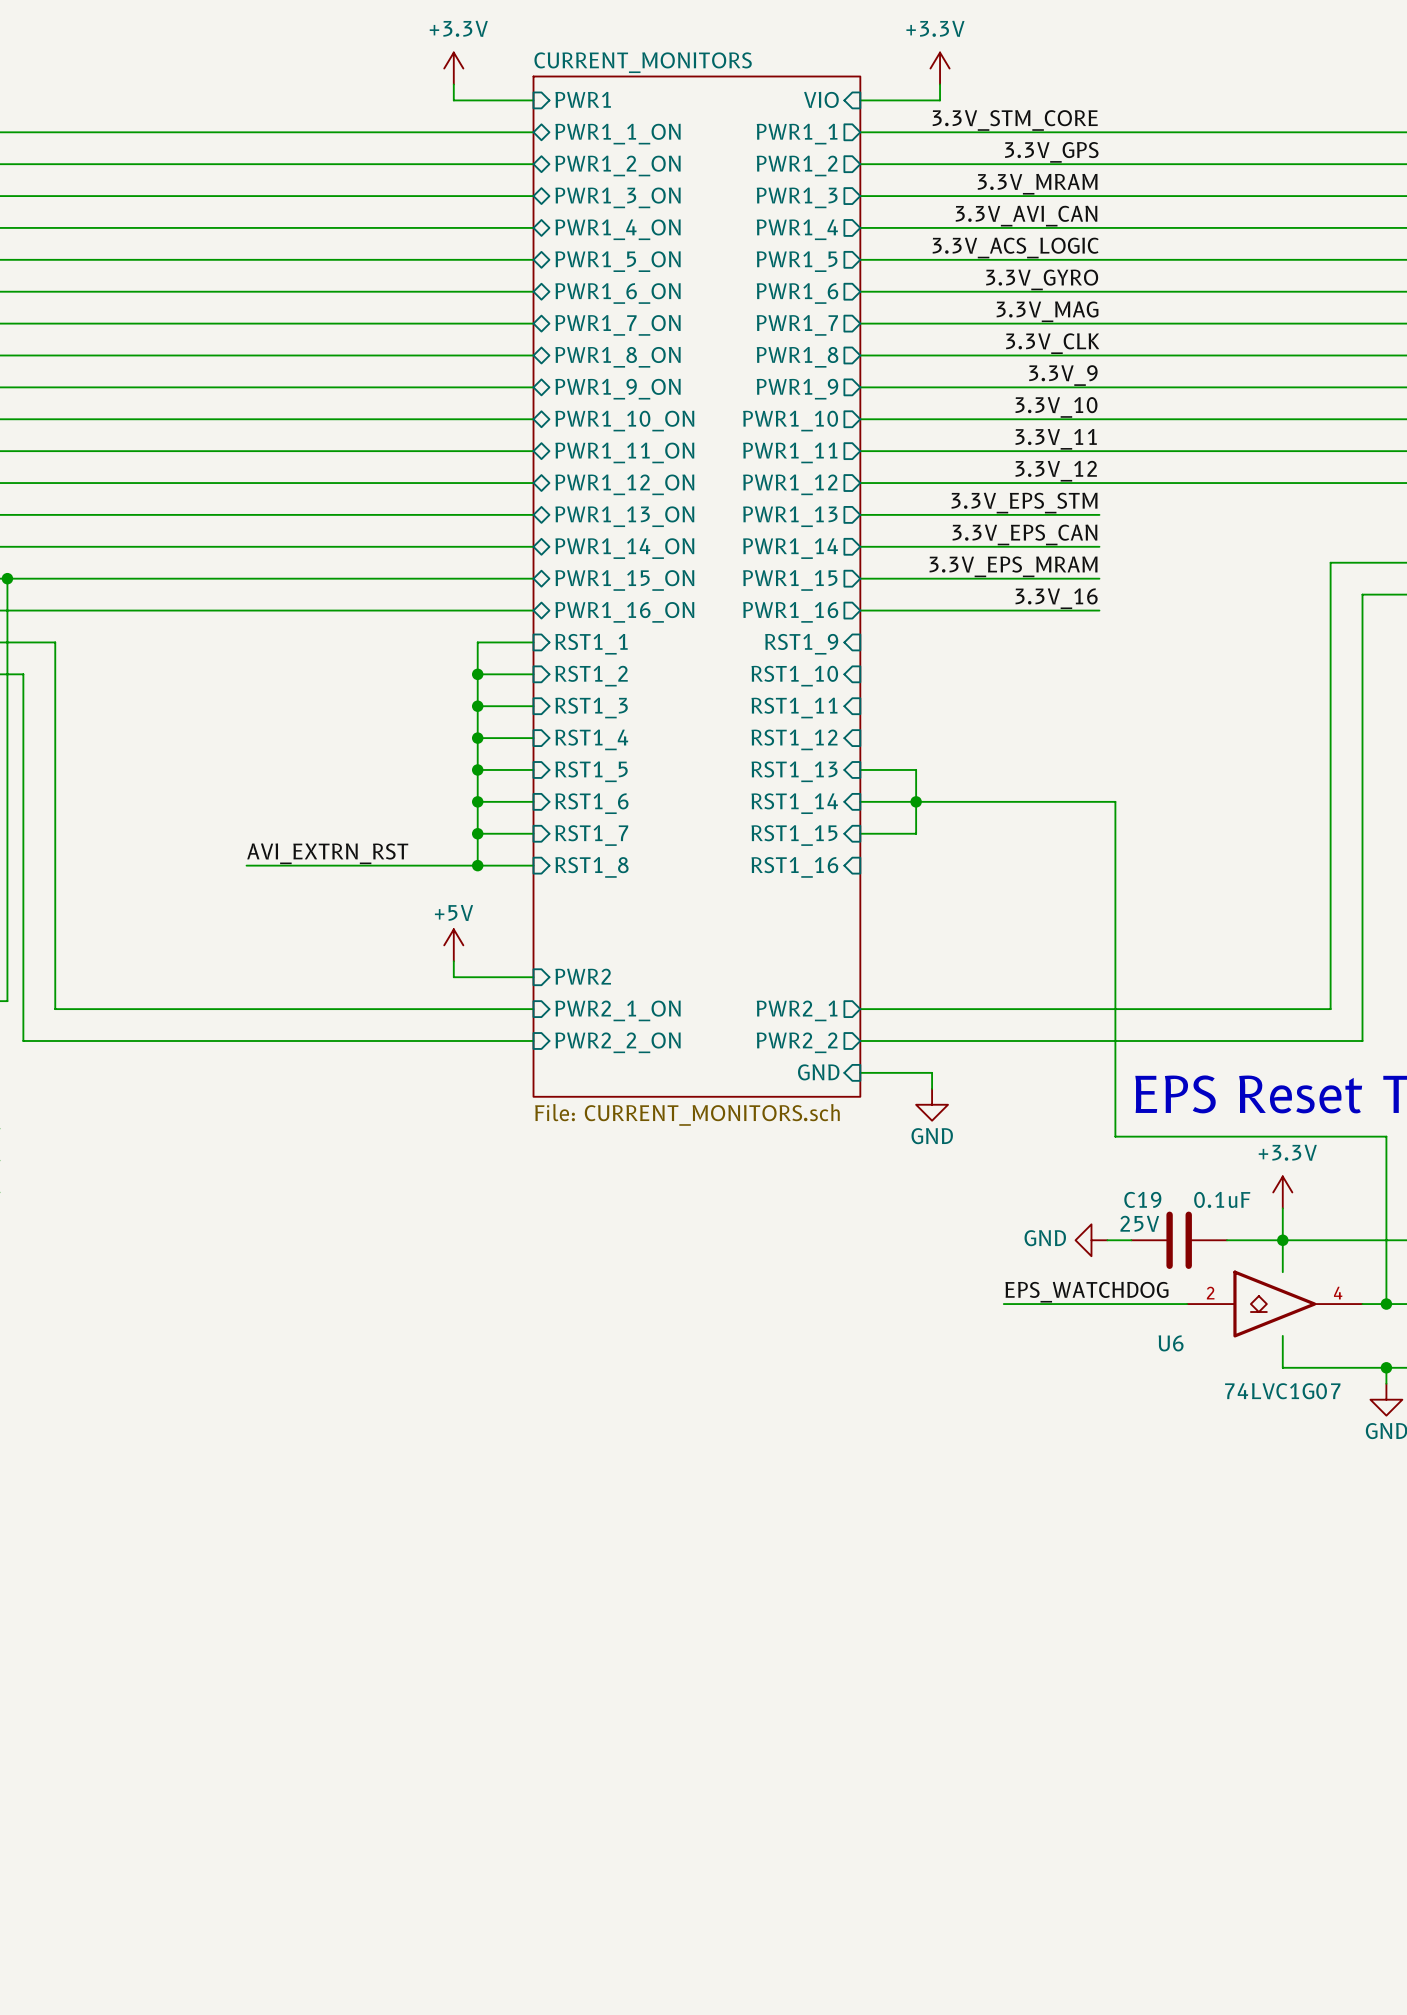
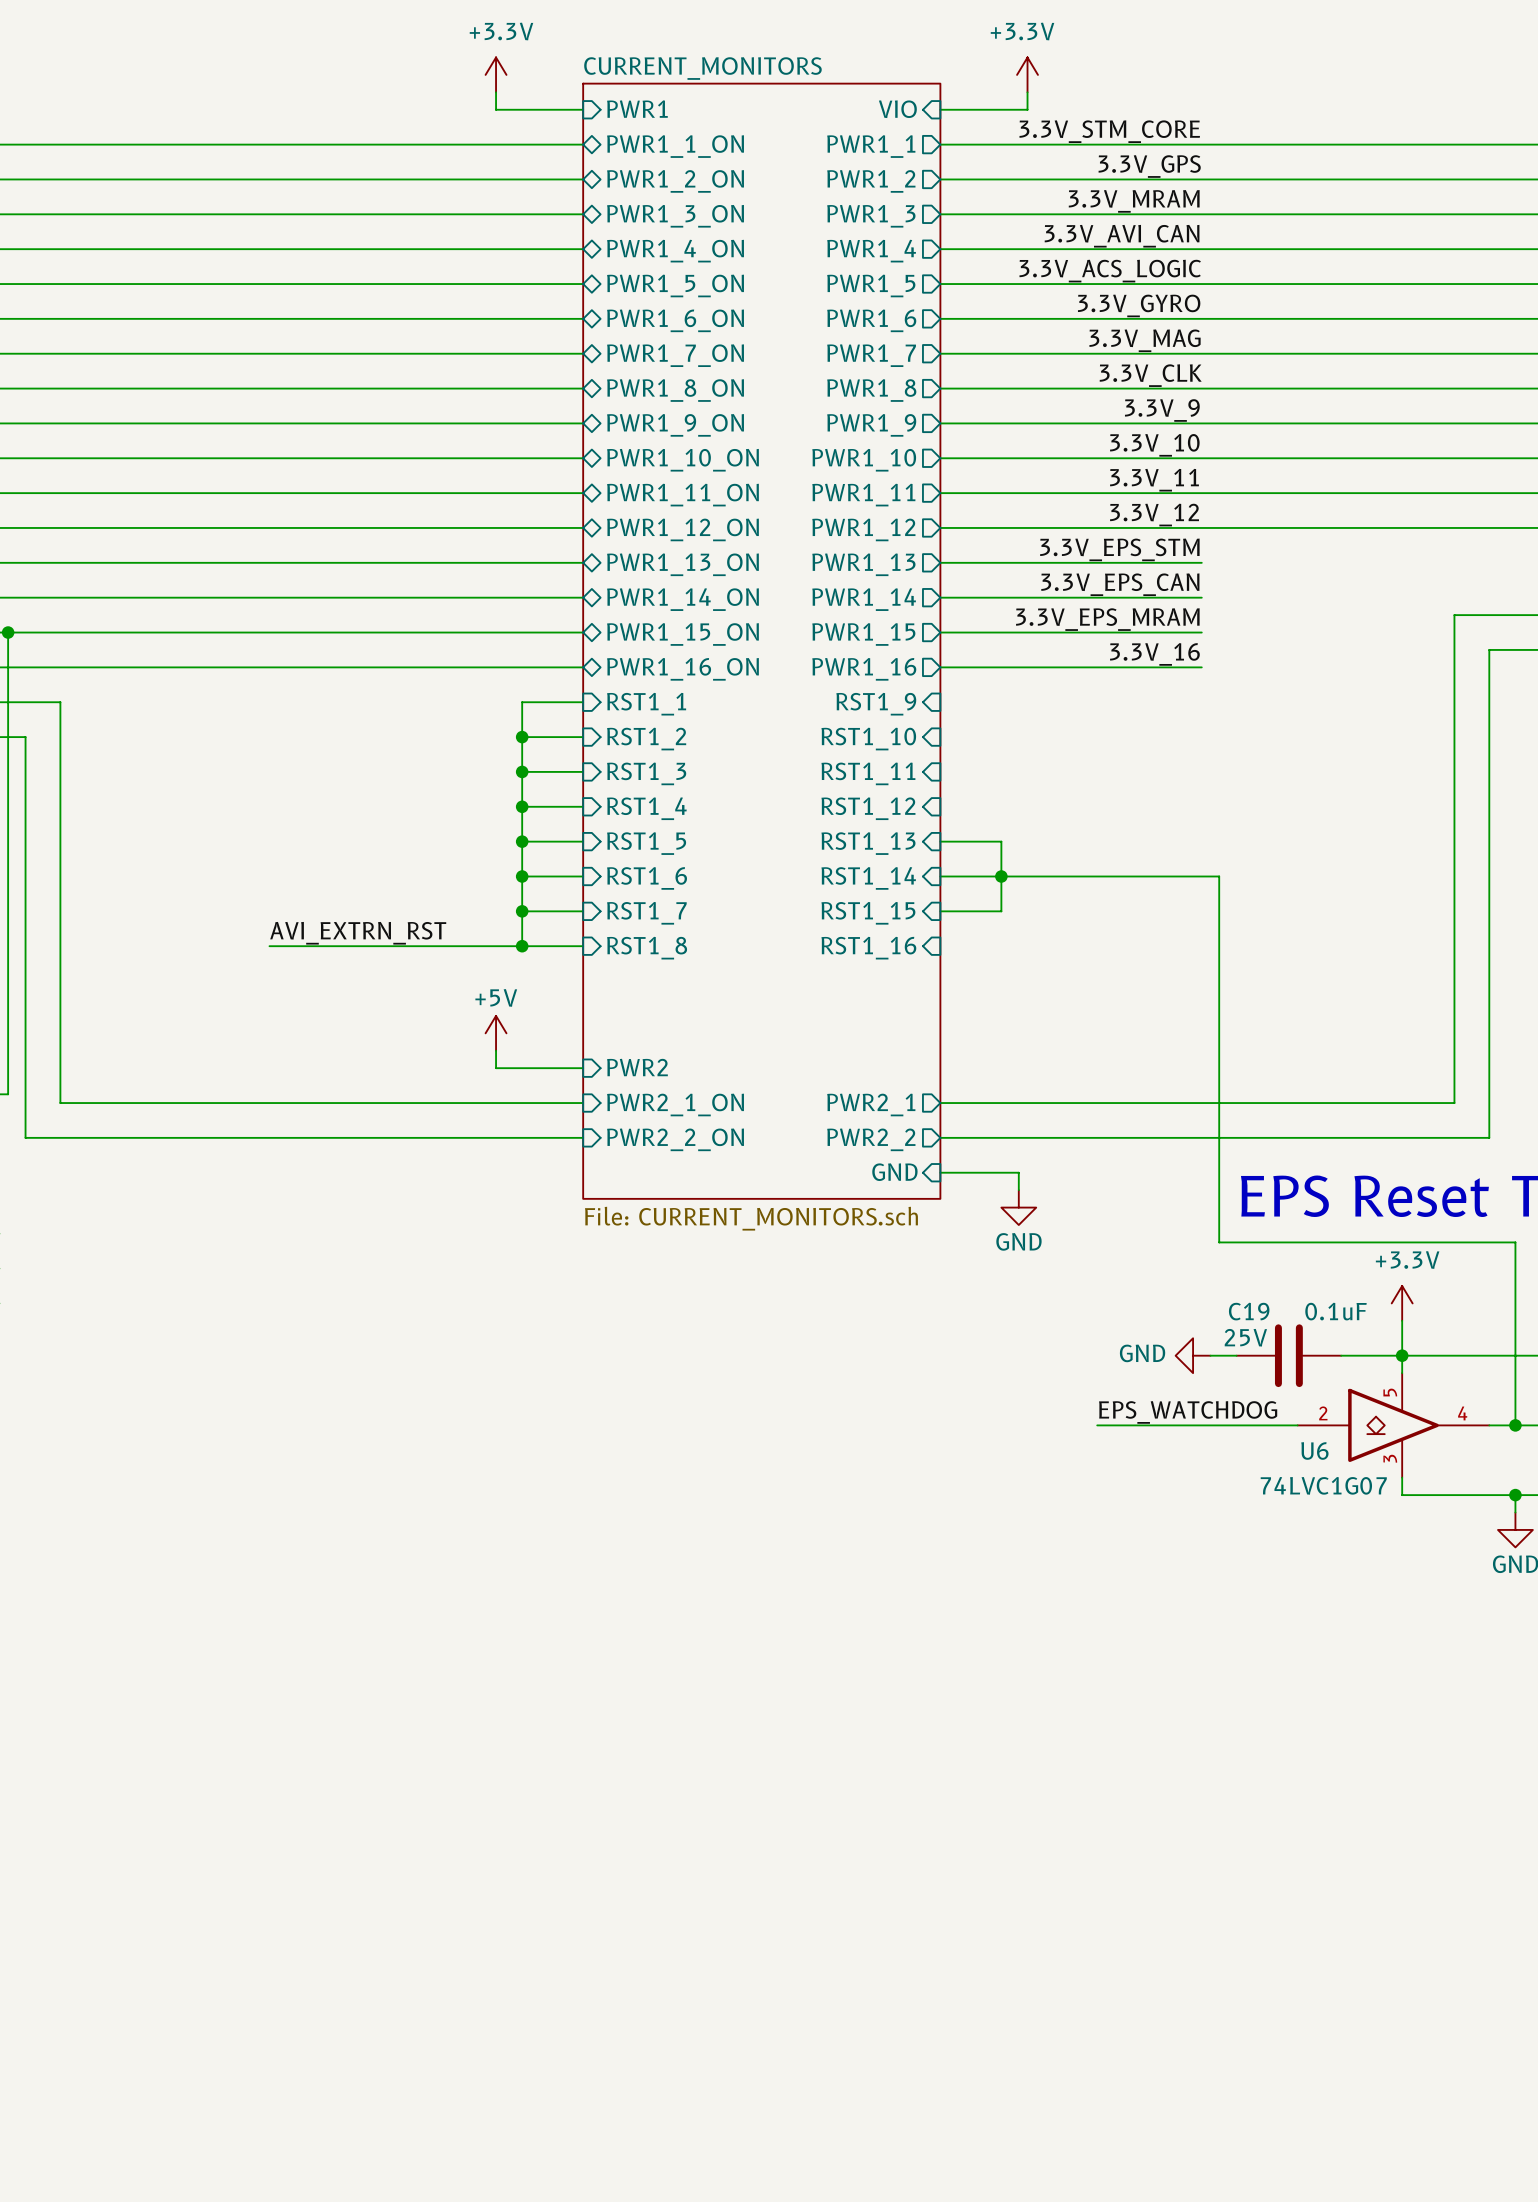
U6 symbol: [1187, 1270, 1363, 1338] -> [1297, 1373, 1490, 1478]
U6 name position: U6 (1171, 1343) -> U6 (1314, 1450)
U6 value position: 74LVC1G07 (1282, 1391) -> 74LVC1G07 (1323, 1485)

